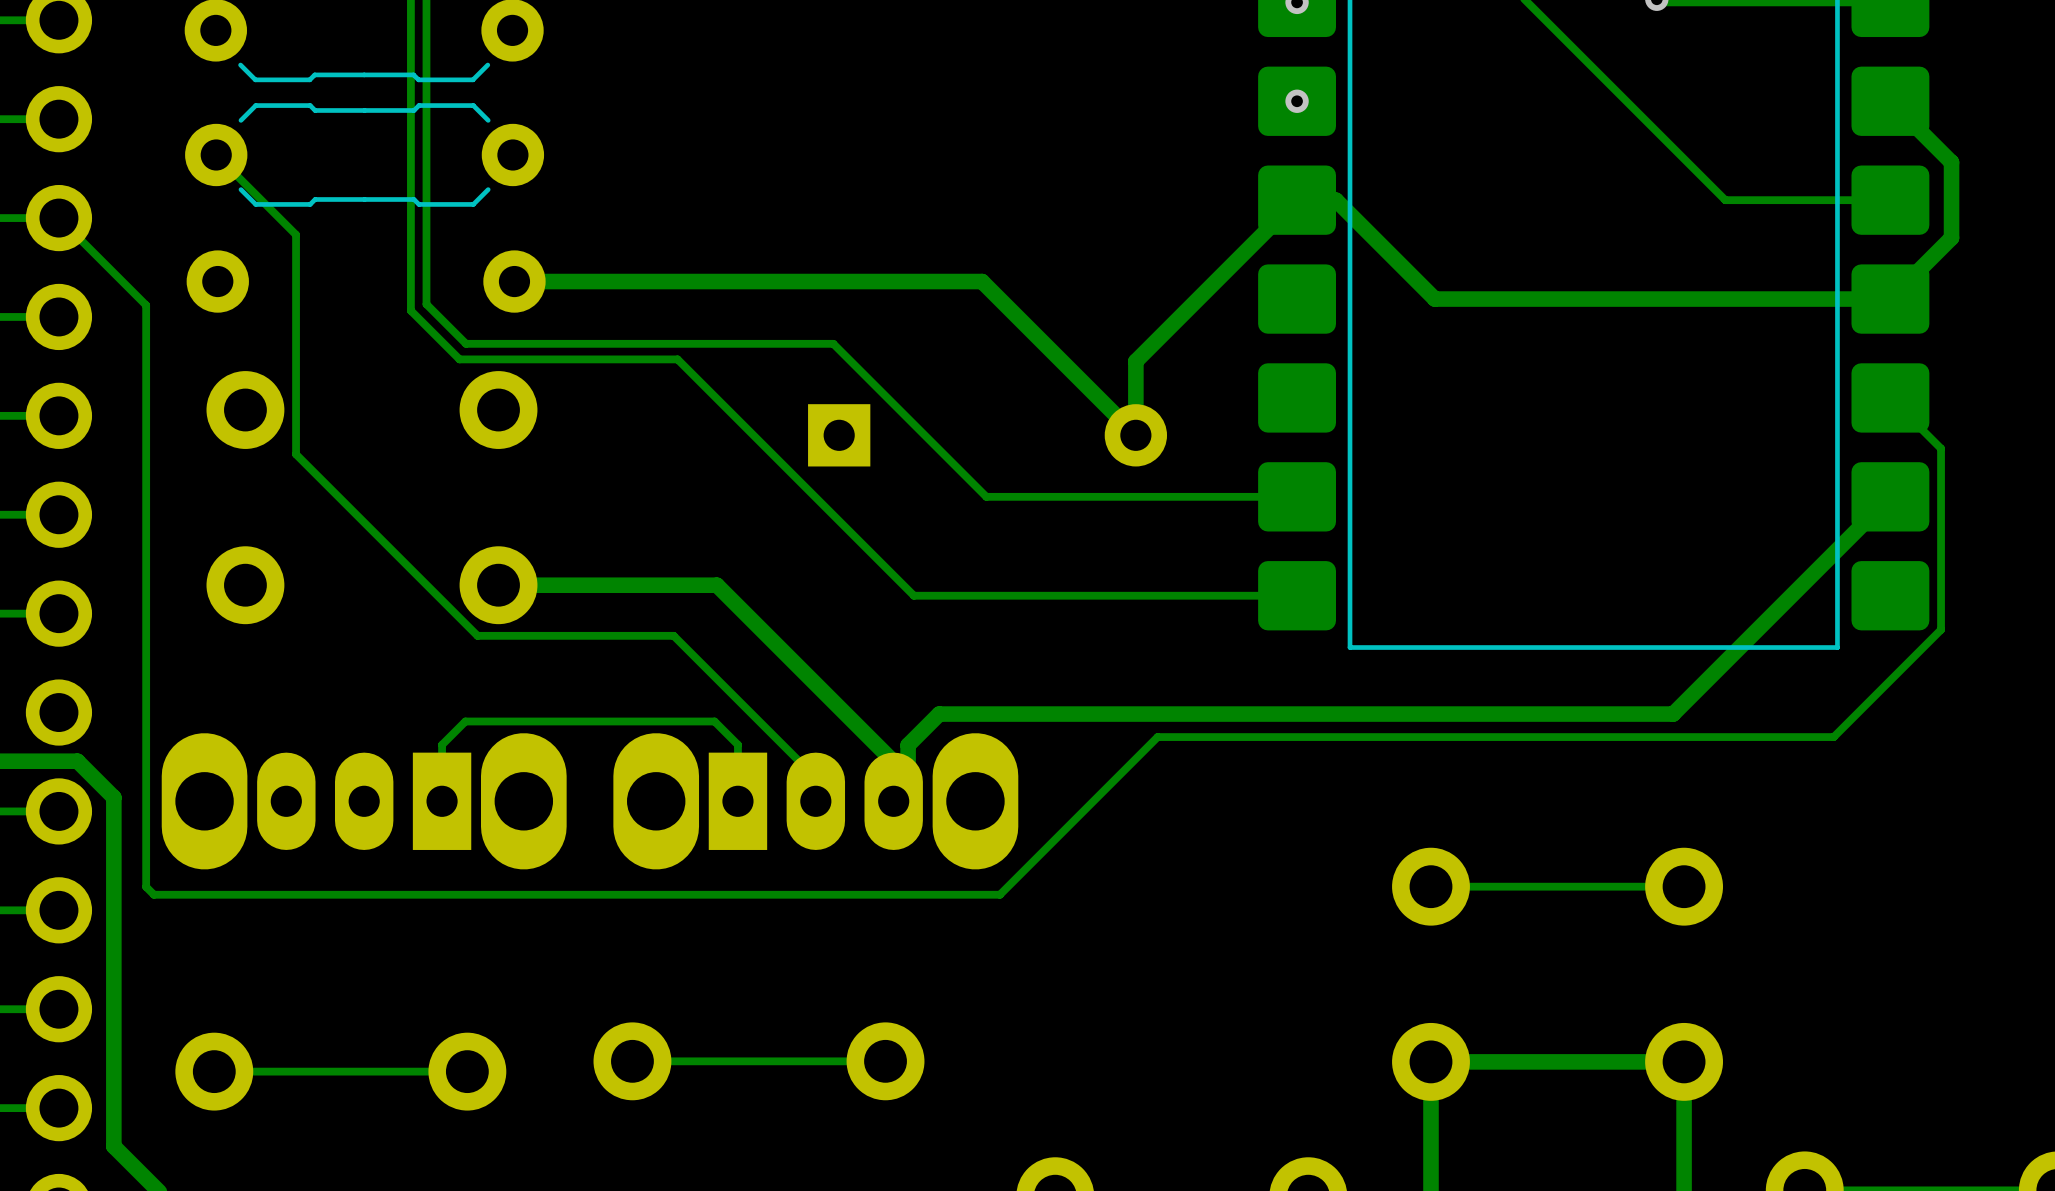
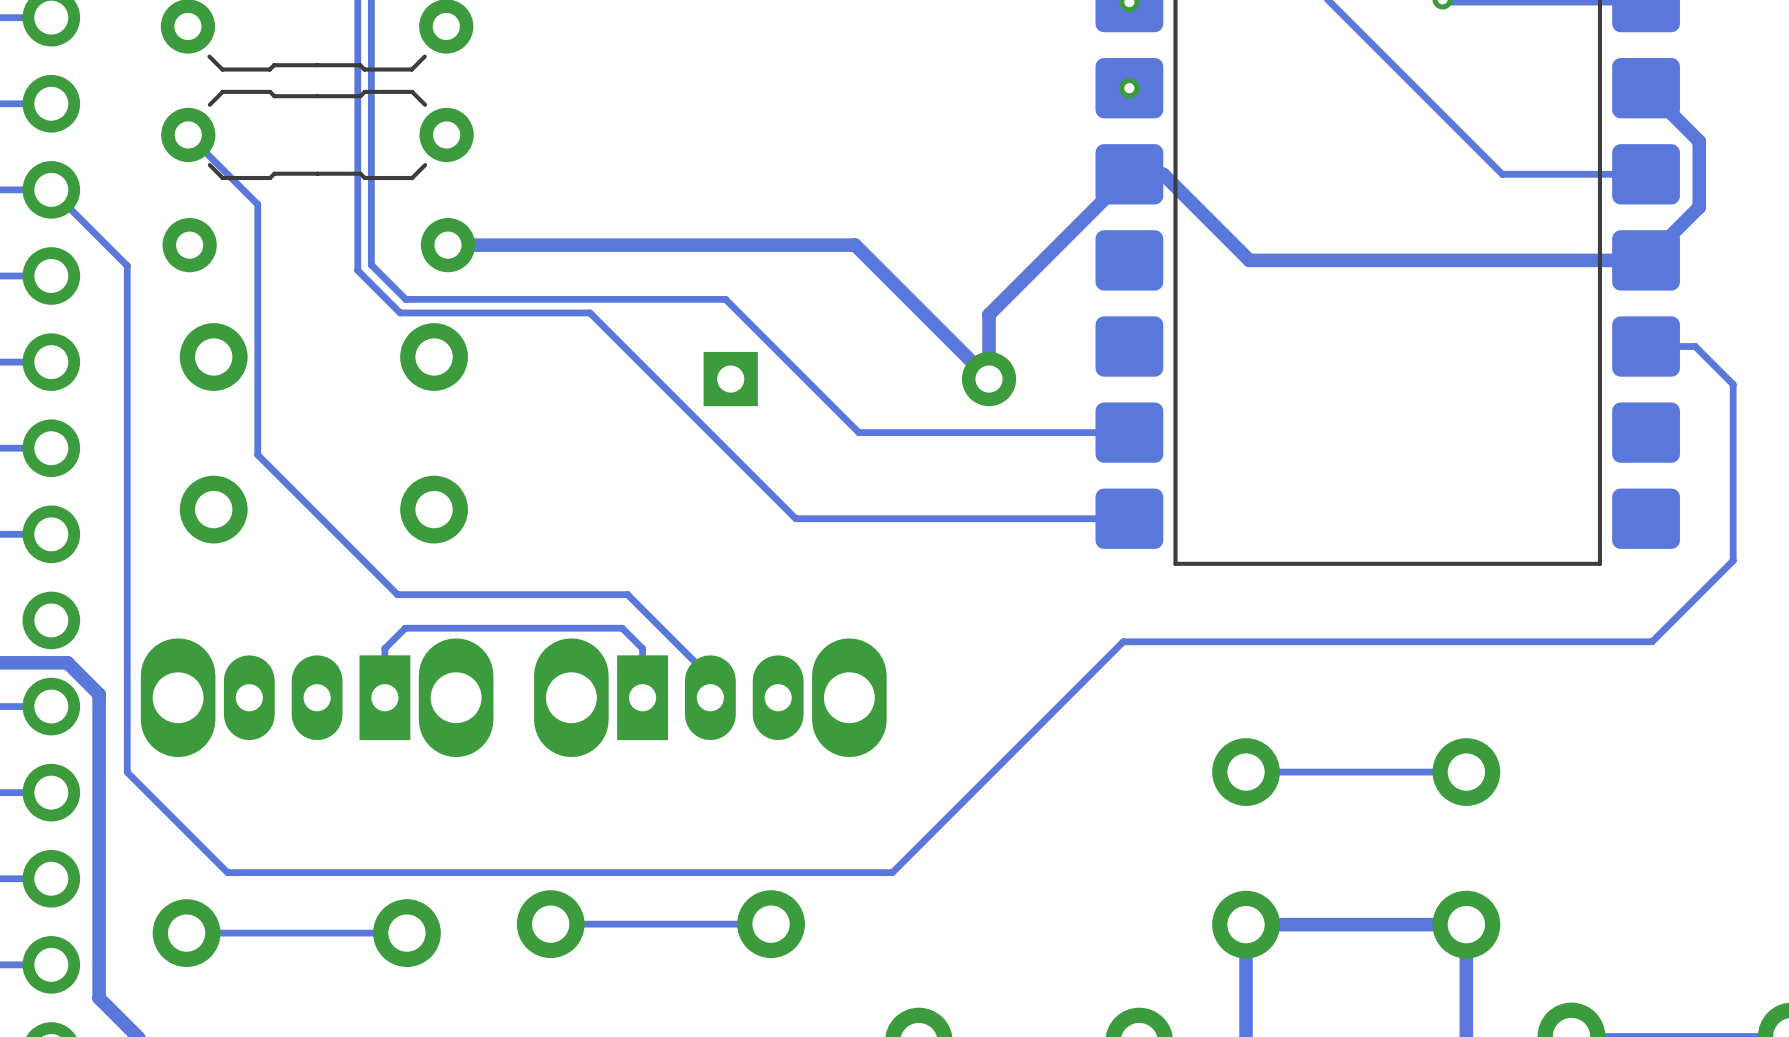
track: (1890, 397) (1941, 448) (1941, 629) (1833, 737) -> (1646, 346) (1695, 346) (1733, 384) (1733, 560) (1652, 641) (1596, 641)
track: (296, 454) (477, 635) (673, 635) (720, 682) -> (257, 395) (257, 454) (397, 594) (627, 594)
track: (1890, 496) (1673, 714) (939, 714) (908, 745) (908, 766) (893, 780) -> none
track: (498, 585) (716, 585) (893, 761) (893, 801) -> none
track: (1290, 737) (1157, 737) (999, 894) (153, 894) -> (1123, 641) (892, 872) (227, 872) (134, 779)

